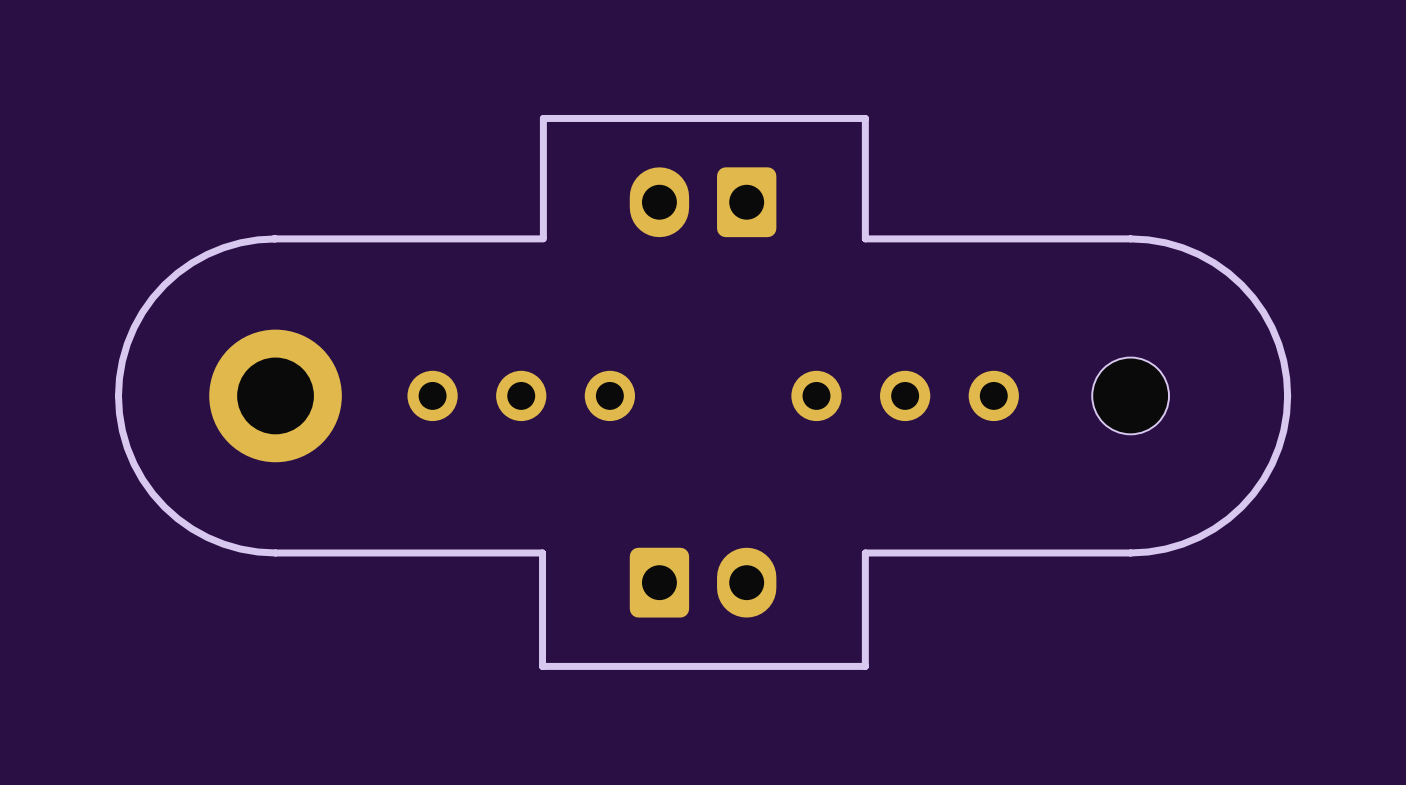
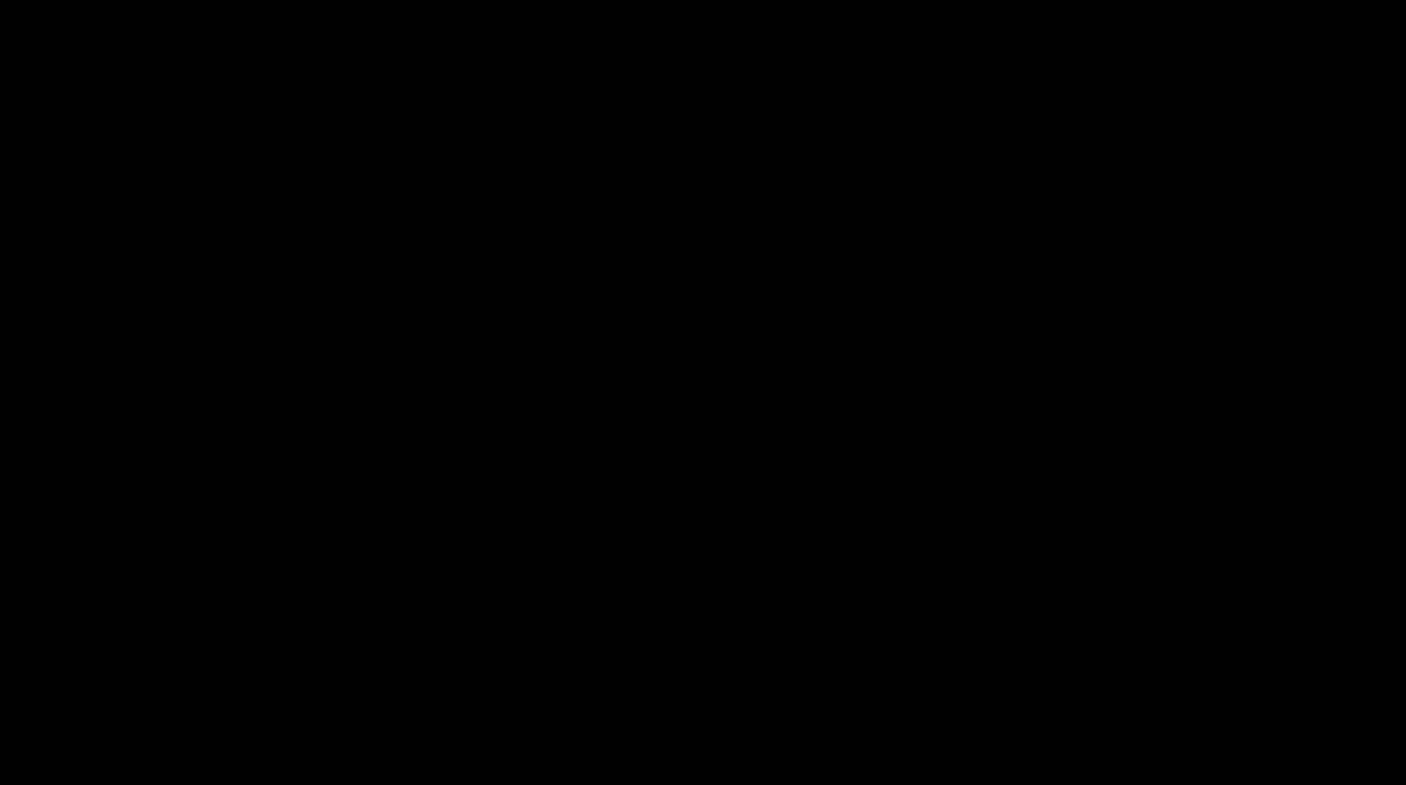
part: (703, 202) -> none
board edge: (543, 237) (543, 118) (865, 118) (865, 238) (1130, 238) (1165, 242) (1198, 254) (1228, 273) (1241, 284) (1253, 298) (1272, 327) (1283, 360) (1286, 378) (1286, 413) (1283, 430) (1272, 464) (1253, 493) (1228, 518) (1198, 537) (1182, 544) (1148, 552) (1130, 552) (865, 552) (865, 666) (542, 666) (542, 552) (275, 552) (240, 549) (207, 537) (177, 518) (152, 493) (142, 479) (127, 447) (122, 430) (118, 395) (122, 360) (134, 327) (142, 312) (164, 284) (191, 262) (223, 247) (257, 239) (275, 238) -> none
board edge: (543, 238) (273, 238) -> none
part: (275, 395) -> none
part: (521, 395) -> none
part: (905, 395) -> none
part: (1130, 395) -> none
part: (703, 582) -> none

